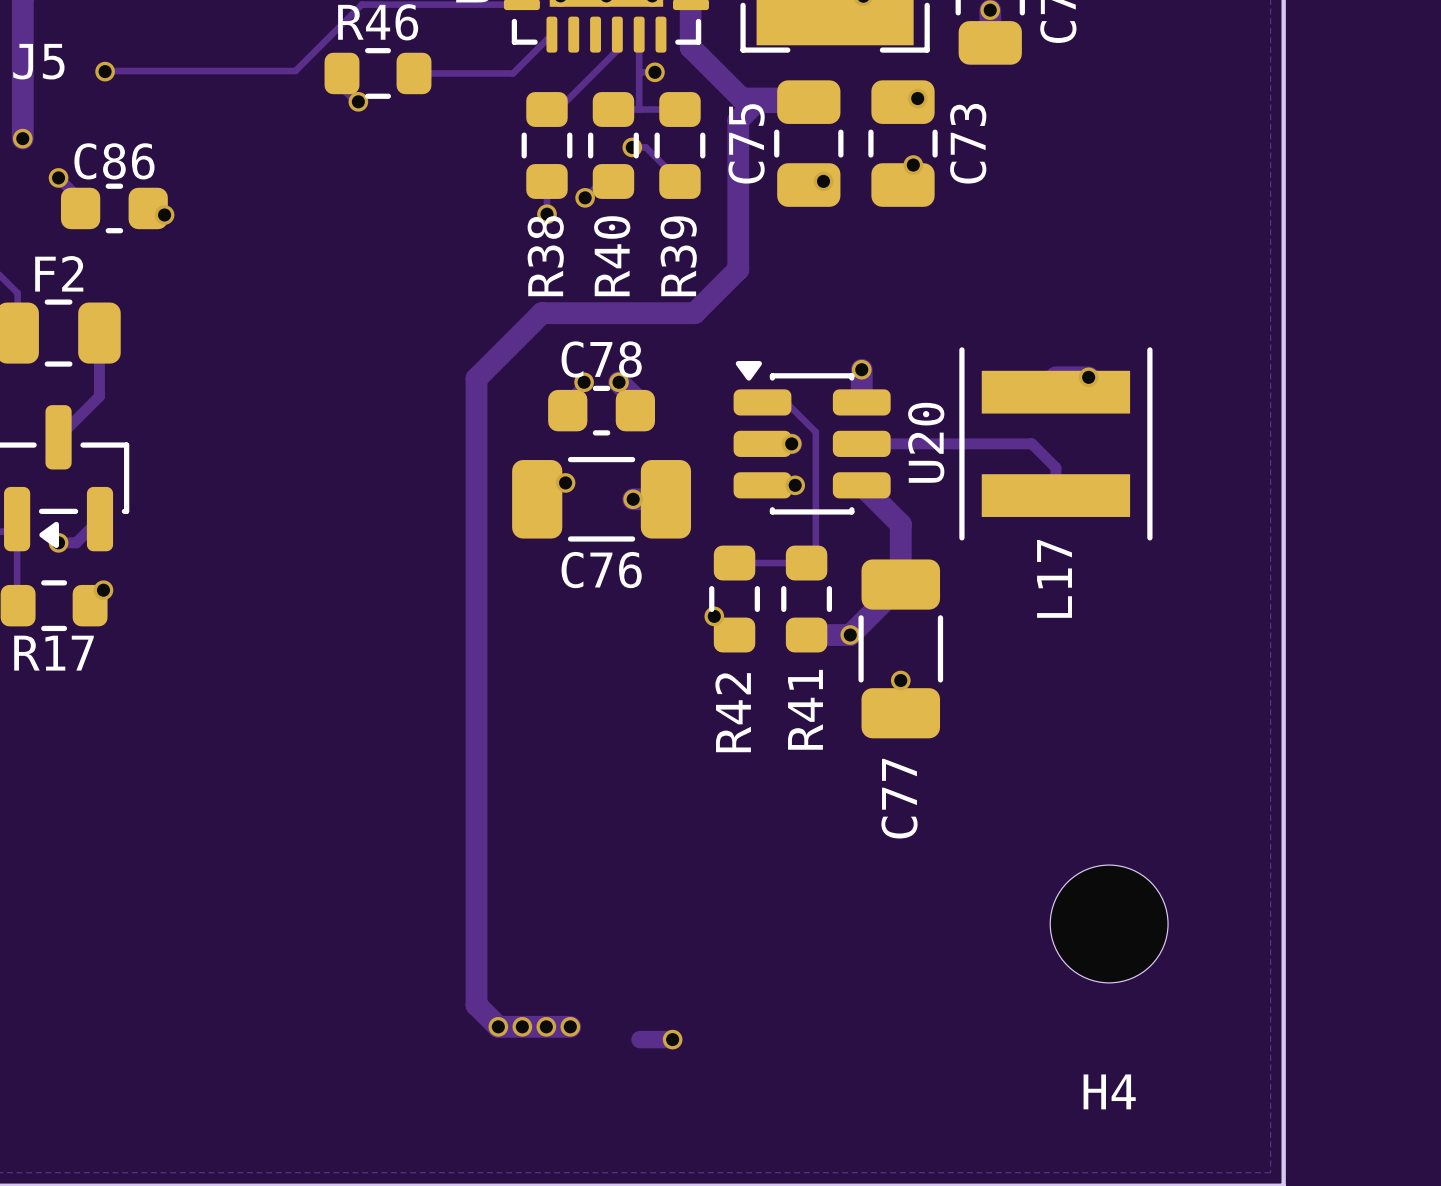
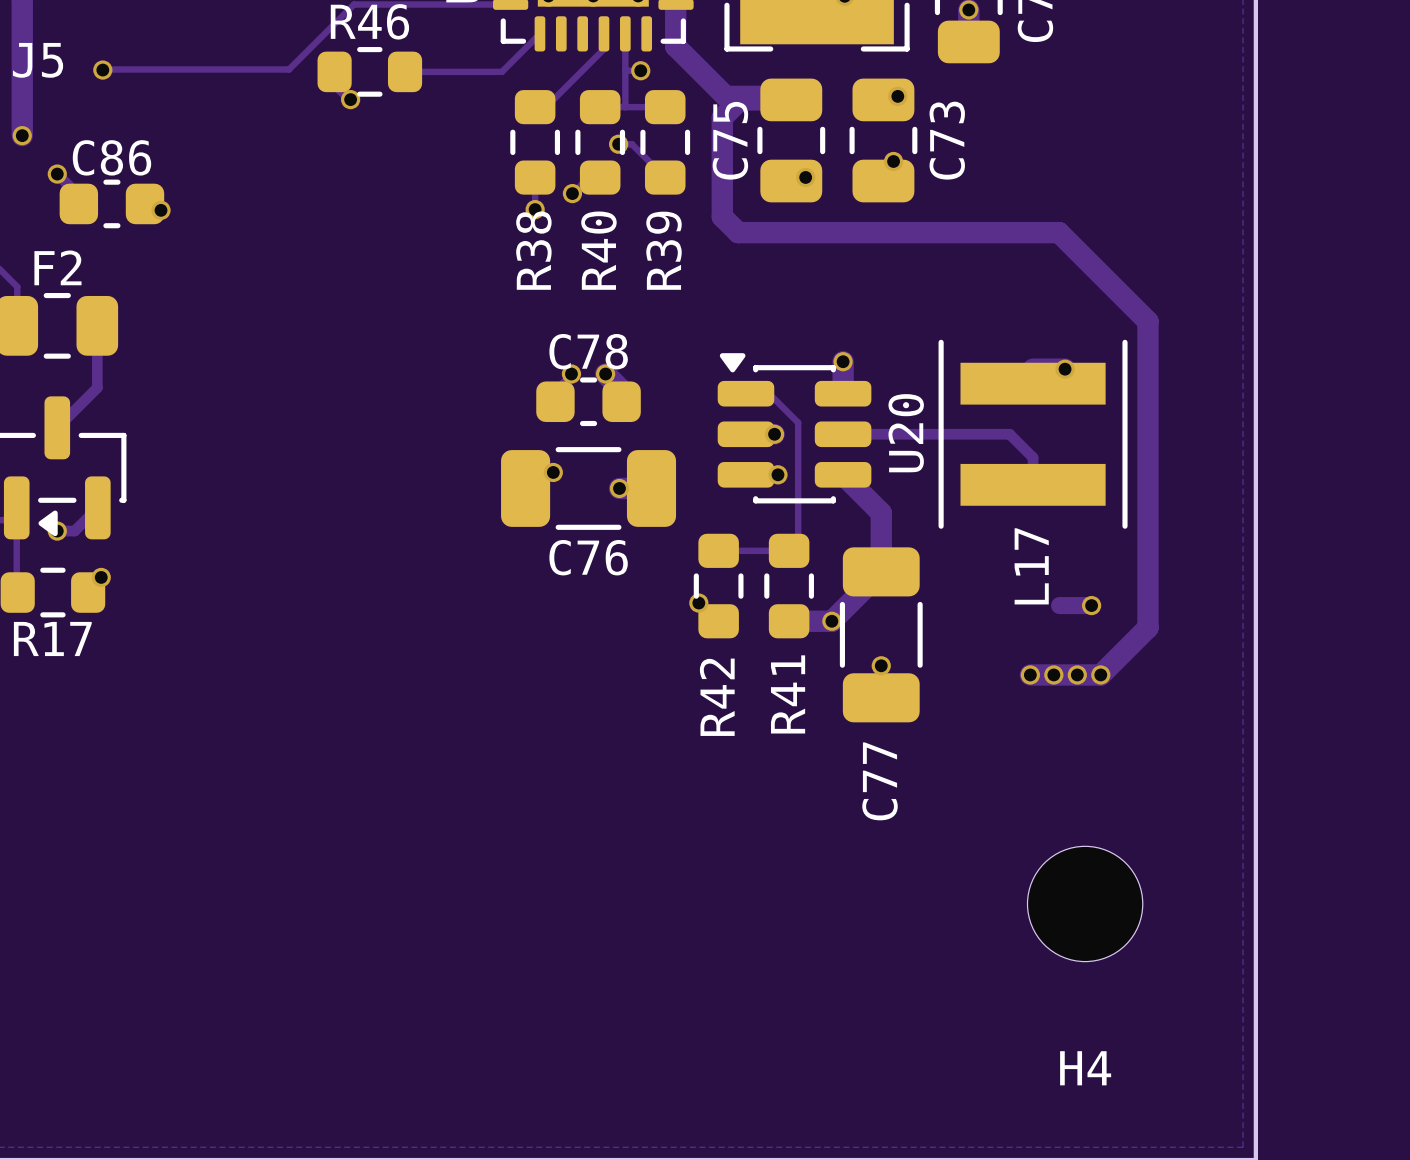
track: (738, 221) (738, 269) (694, 313) (541, 313) (476, 378) (476, 1005) (498, 1026) (570, 1026) -> (722, 216) (738, 232) (1059, 232) (1147, 321) (1147, 627) (1100, 674) (1030, 674)
via: none -> (1091, 605)
via: none -> (1030, 674)
via: none -> (1053, 674)
via: none -> (1077, 674)
via: none -> (1100, 674)
via: (498, 1026) -> none
via: (522, 1026) -> none
via: (546, 1026) -> none
via: (570, 1026) -> none
track: (639, 1039) (672, 1039) -> (1059, 605) (1091, 605)
via: (672, 1039) -> none

